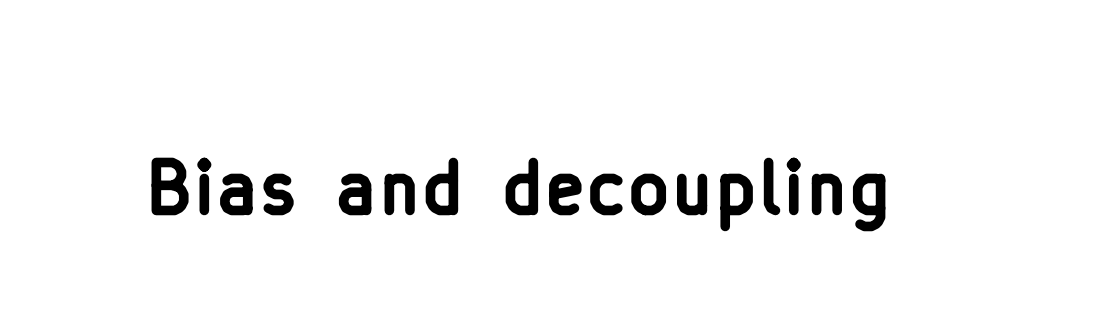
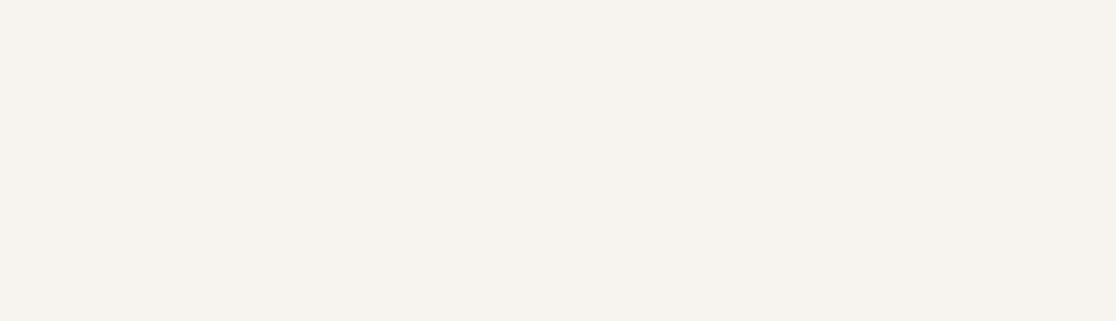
text: Bias and decoupling (518, 194) -> none

